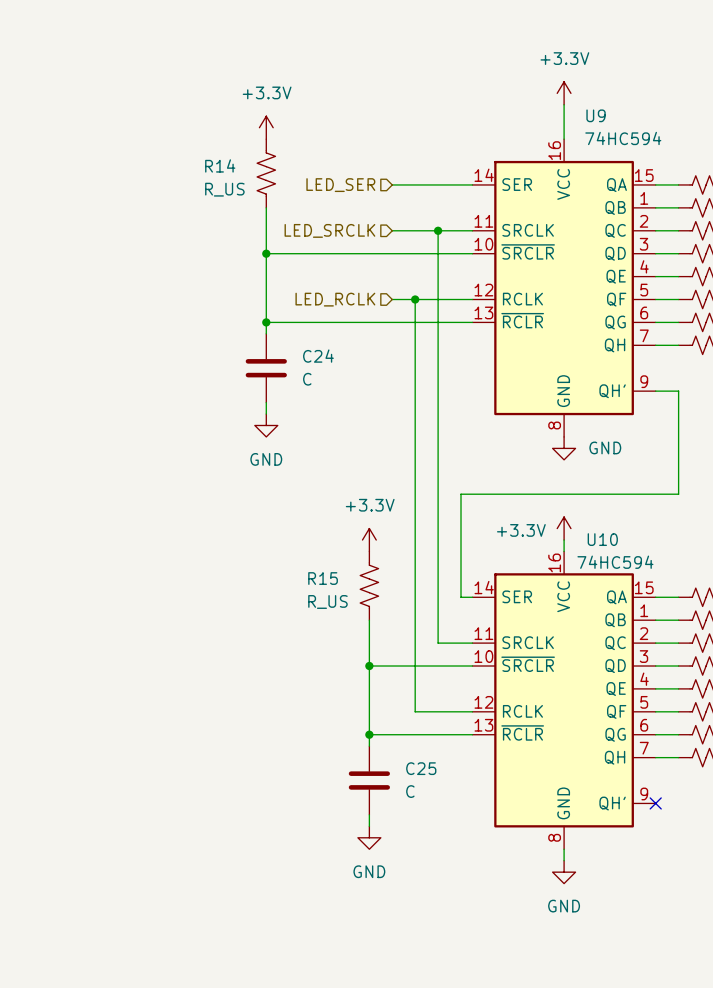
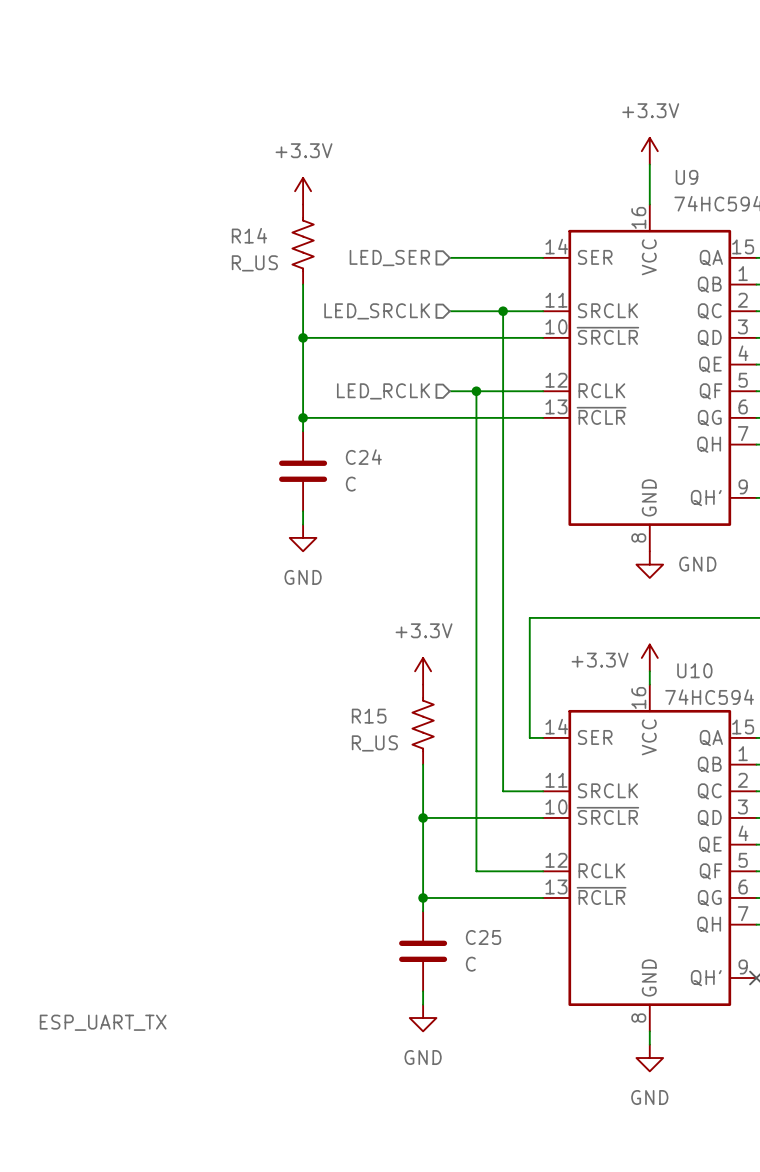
label: none -> ESP_UART_TX (103, 1022)

